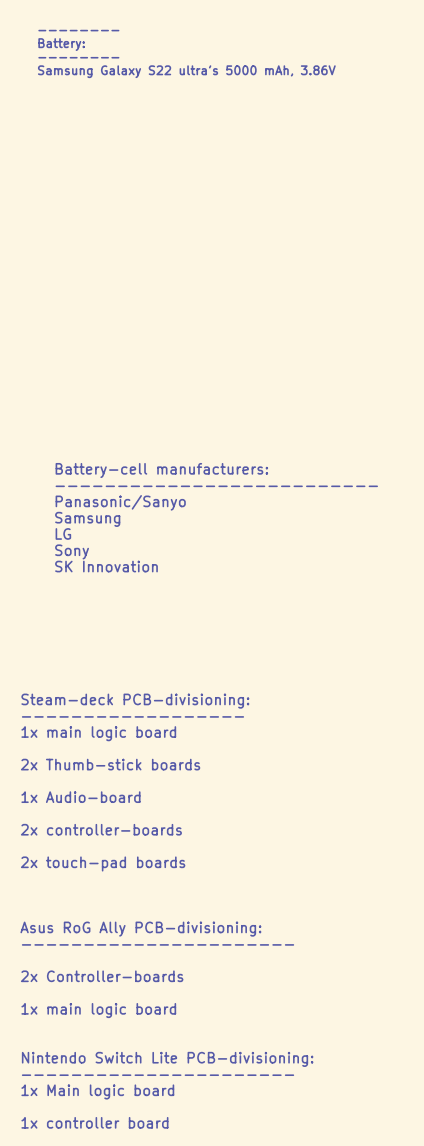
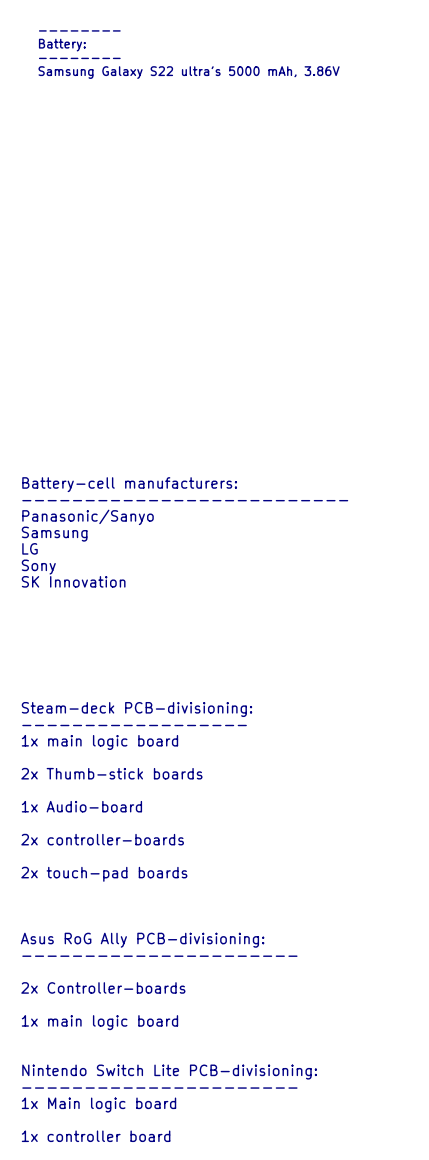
text position: Battery-cell manufacturers: (161, 470) -> Battery-cell manufacturers: (129, 484)
text position: -------------------------- (216, 486) -> -------------------------- (185, 500)
text position: Panasonic/Sanyo (120, 502) -> Panasonic/Sanyo (88, 517)
text position: Samsung (87, 519) -> Samsung (54, 534)
text position: LG (63, 533) -> LG (30, 548)
text position: Sony (72, 551) -> Sony (38, 567)
text position: SK Innovation (106, 566) -> SK Innovation (73, 581)

